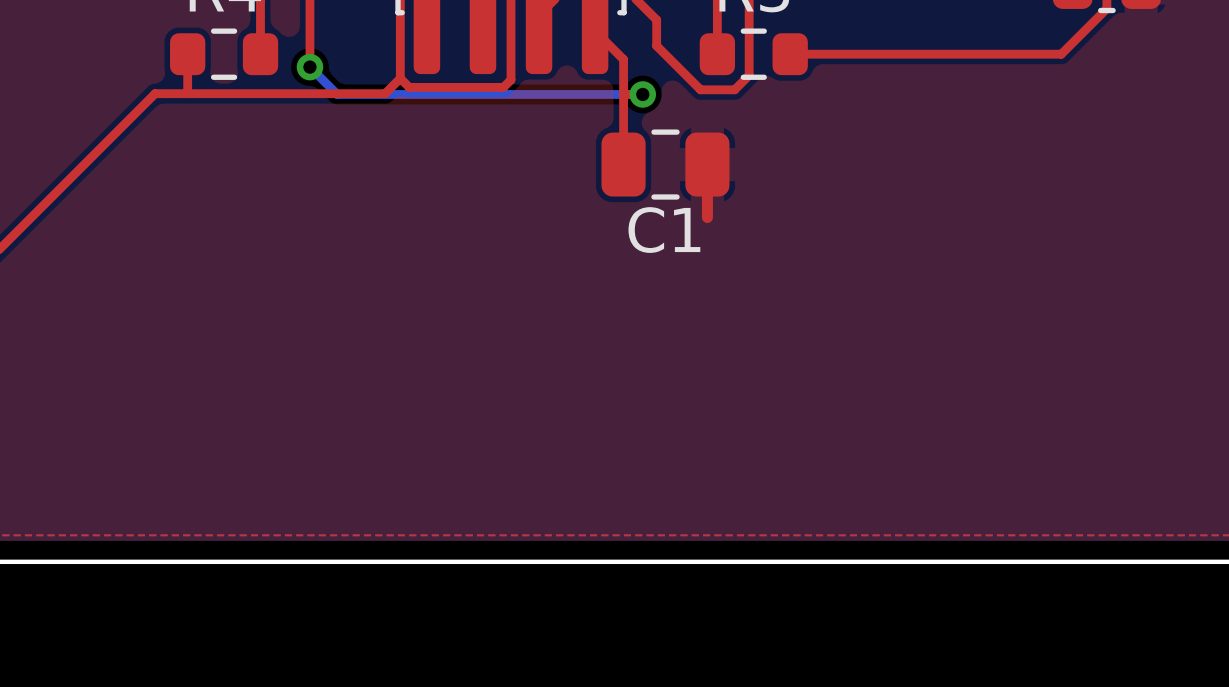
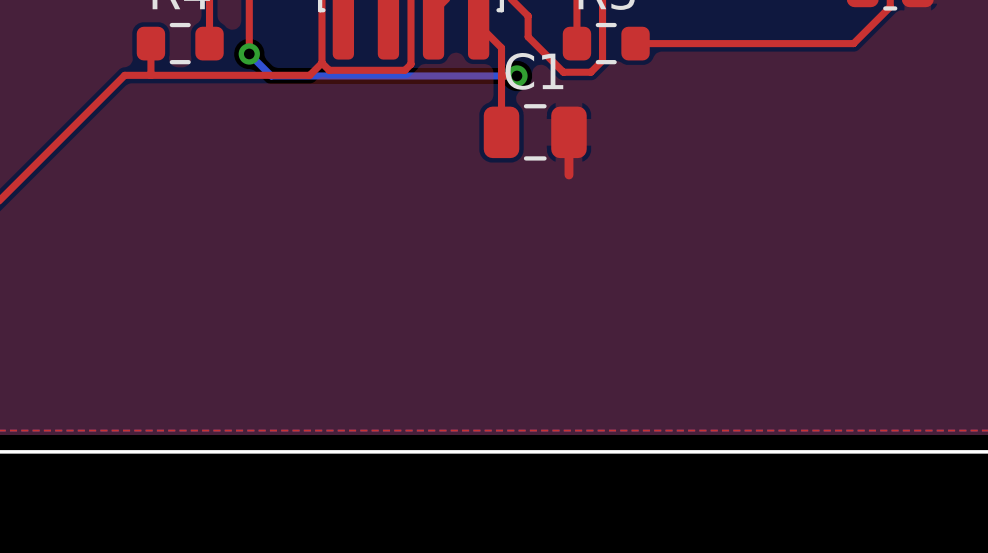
C1 name position: C1 (664, 230) -> C1 (534, 71)

